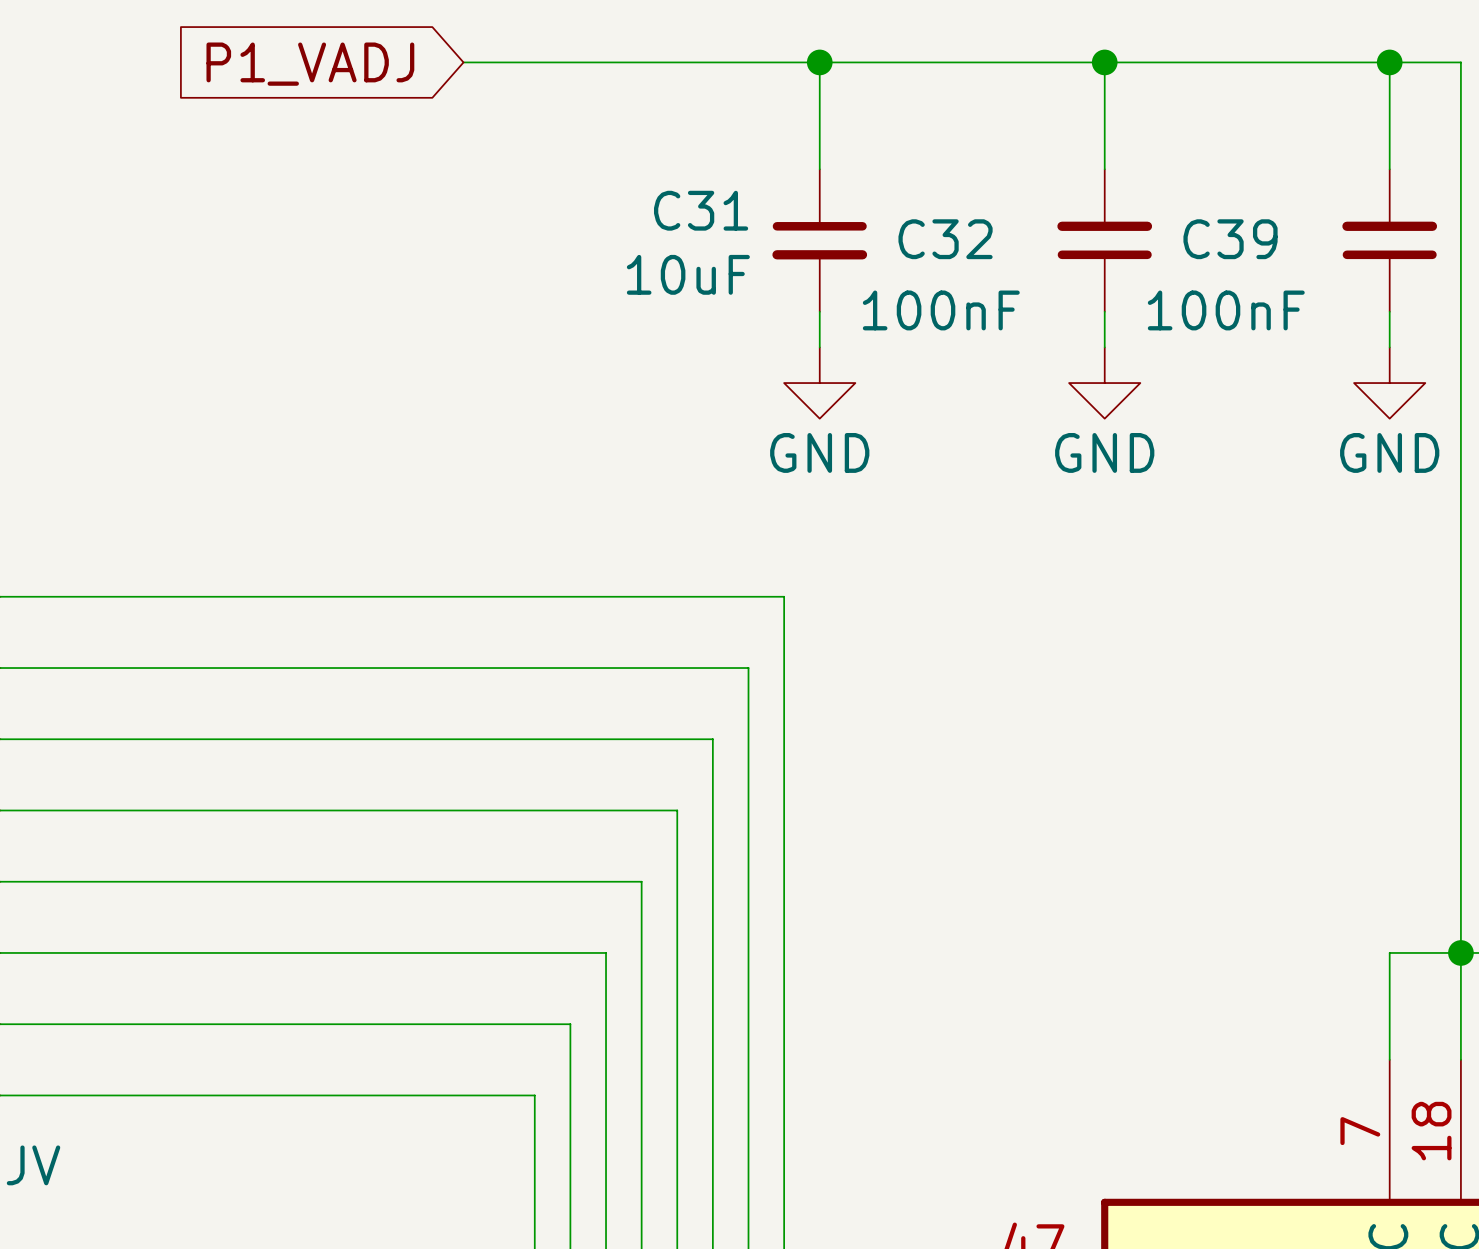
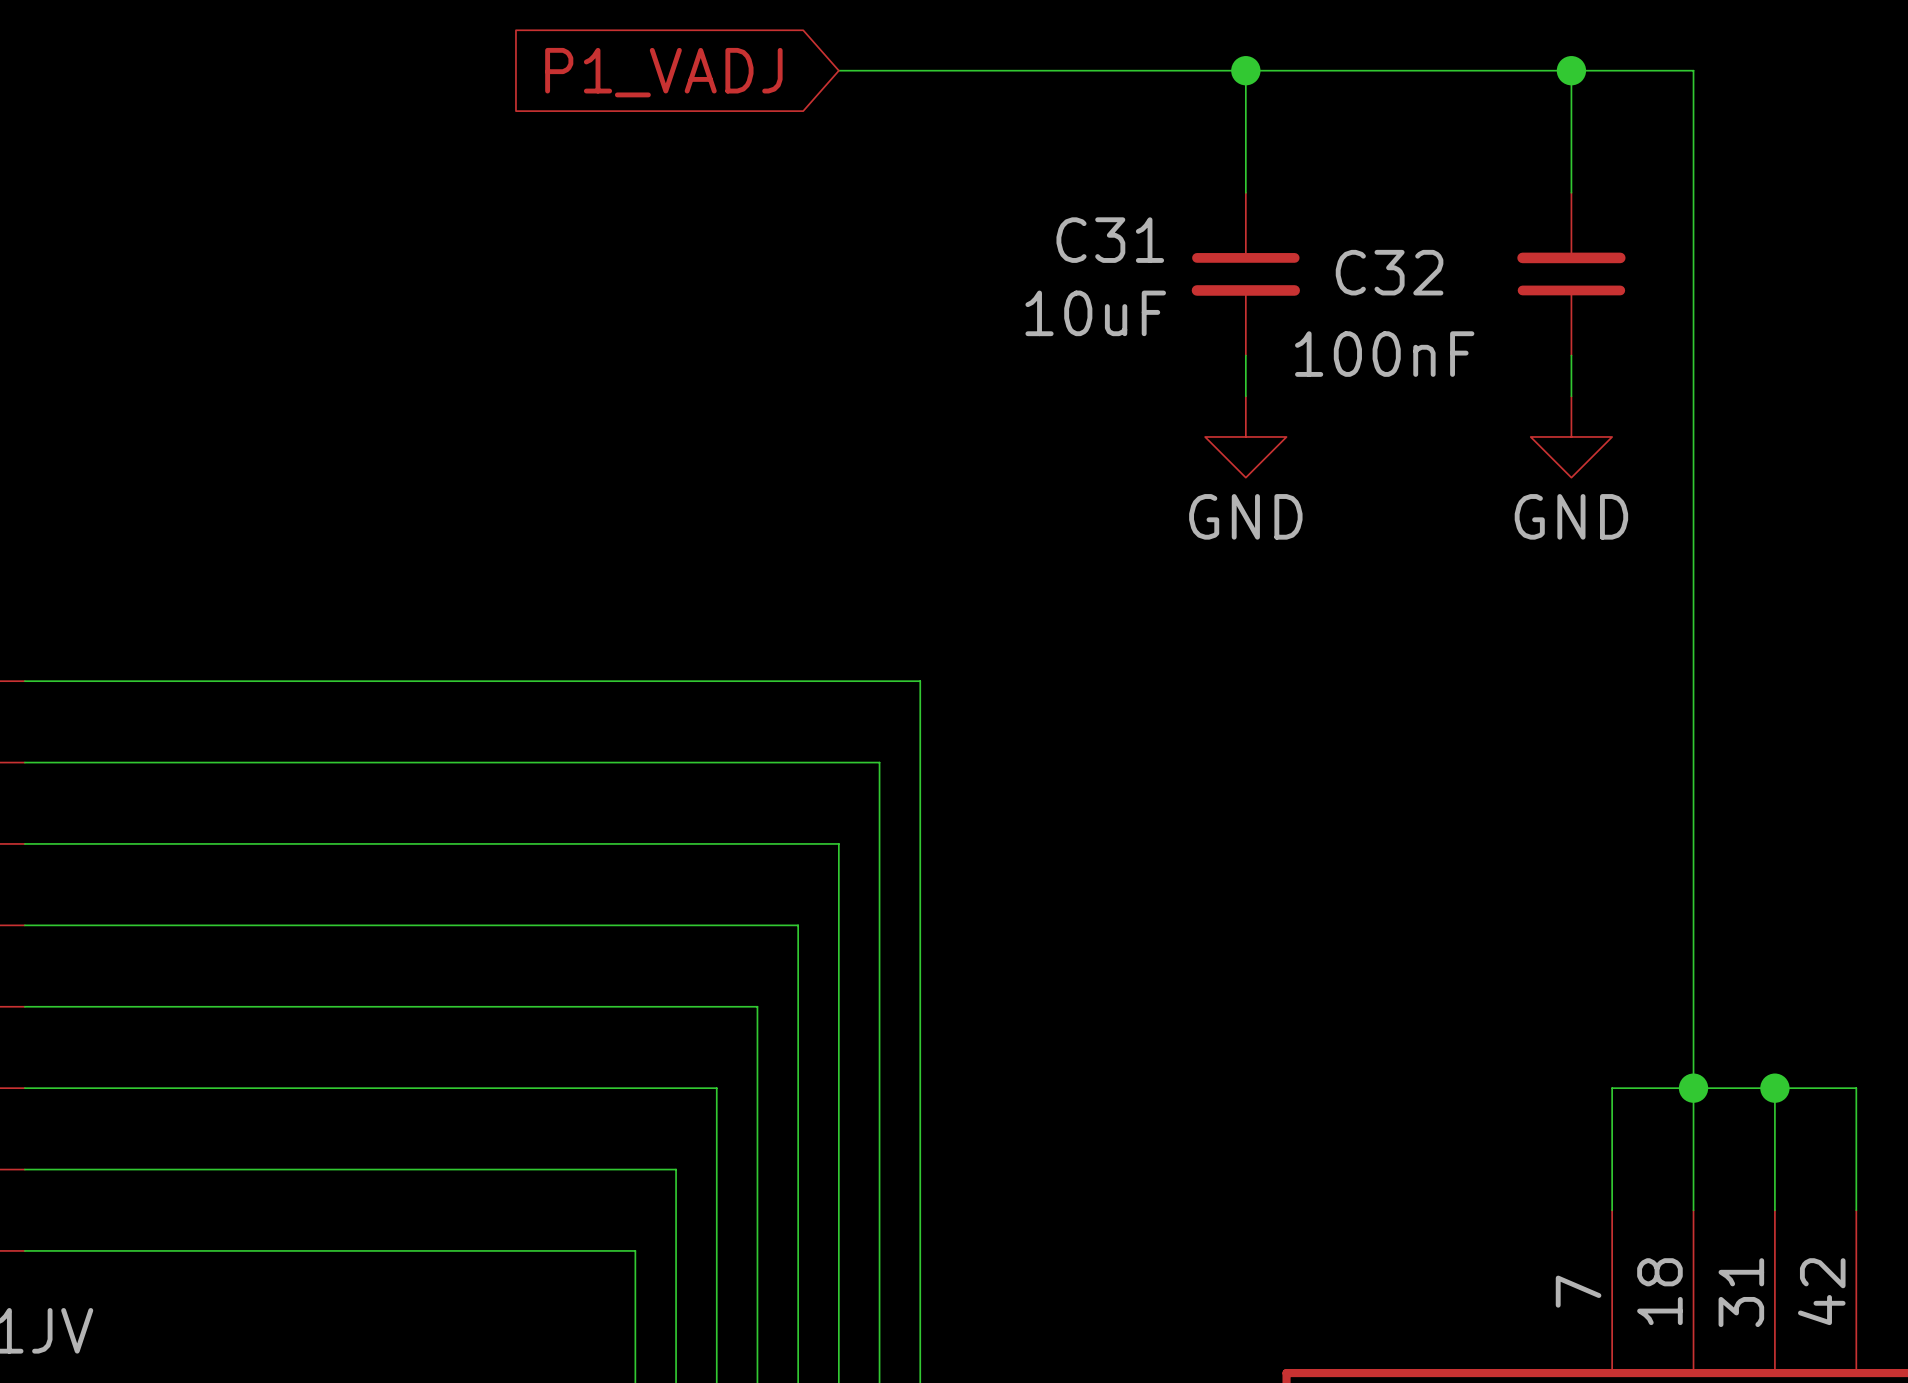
wire: (463, 62) (712, 62) -> none
wire: (819, 62) (819, 169) -> none
junction: (819, 62) -> none
wire: (1104, 62) (1104, 169) -> (1245, 70) (1245, 192)
junction position: (1104, 62) -> (1245, 70)
wire: (1389, 62) (1389, 169) -> (1571, 70) (1571, 192)
junction position: (1389, 62) -> (1571, 70)
global label position: P1_VADJ (310, 64) -> P1_VADJ (663, 72)
C31 position: (819, 240) -> (1245, 274)
C32 position: (1104, 240) -> (1571, 274)
C39: 100nF (1389, 240) -> none
wire: (819, 311) (819, 347) -> none
wire: (1104, 311) (1104, 347) -> (1245, 355) (1245, 396)
wire: (1389, 311) (1389, 347) -> (1571, 355) (1571, 396)
power symbol: GND (819, 383) -> none
power symbol position: GND (1104, 383) -> GND (1245, 436)
power symbol position: GND (1389, 383) -> GND (1571, 436)

